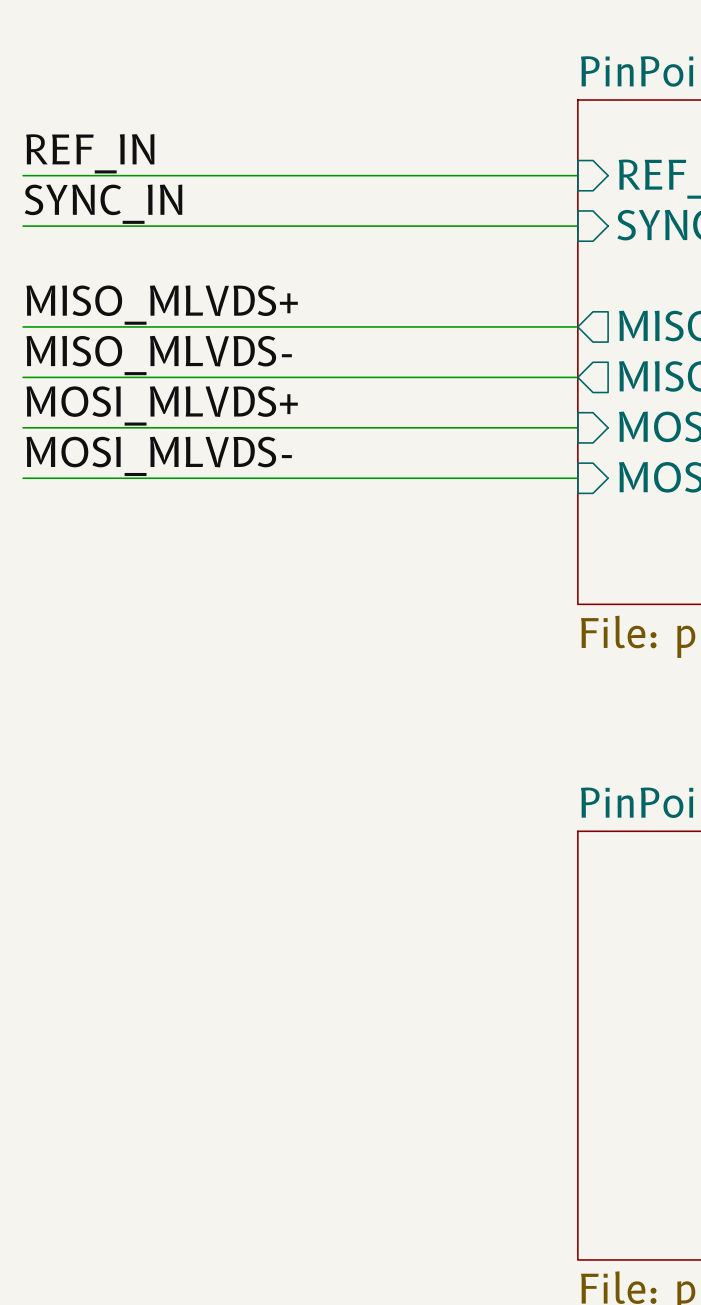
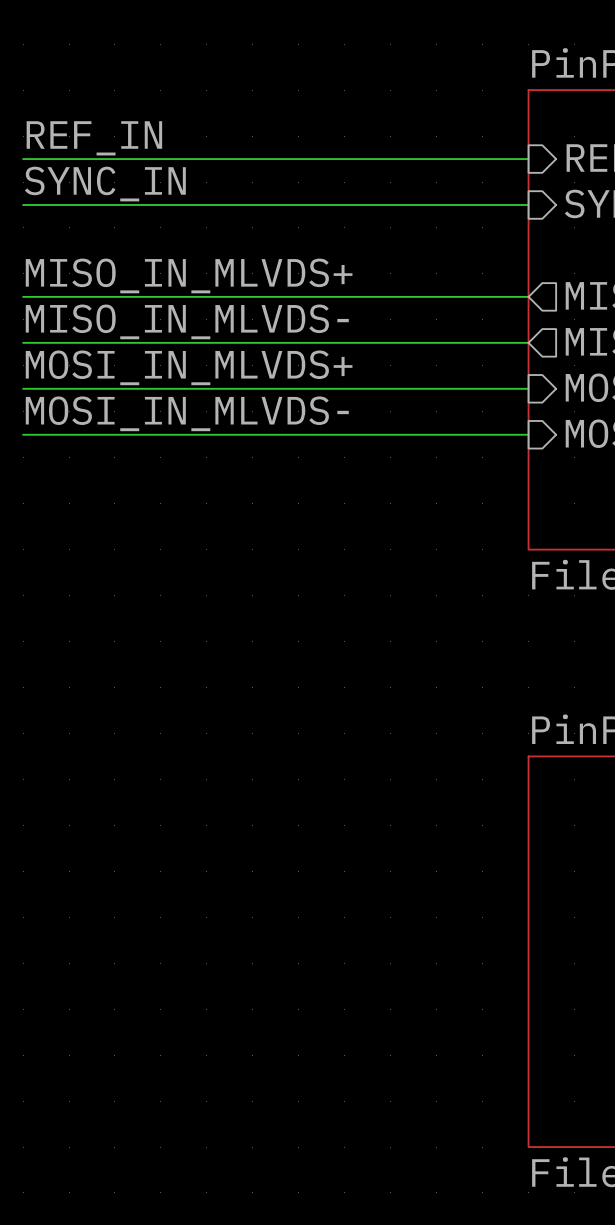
label: MISO_MLVDS+ (162, 305) -> MISO_IN_MLVDS+ (189, 275)
label: MISO_MLVDS- (159, 355) -> MISO_IN_MLVDS- (187, 321)
label: MOSI_MLVDS+ (162, 405) -> MOSI_IN_MLVDS+ (189, 367)
label: MOSI_MLVDS- (159, 456) -> MOSI_IN_MLVDS- (187, 413)

